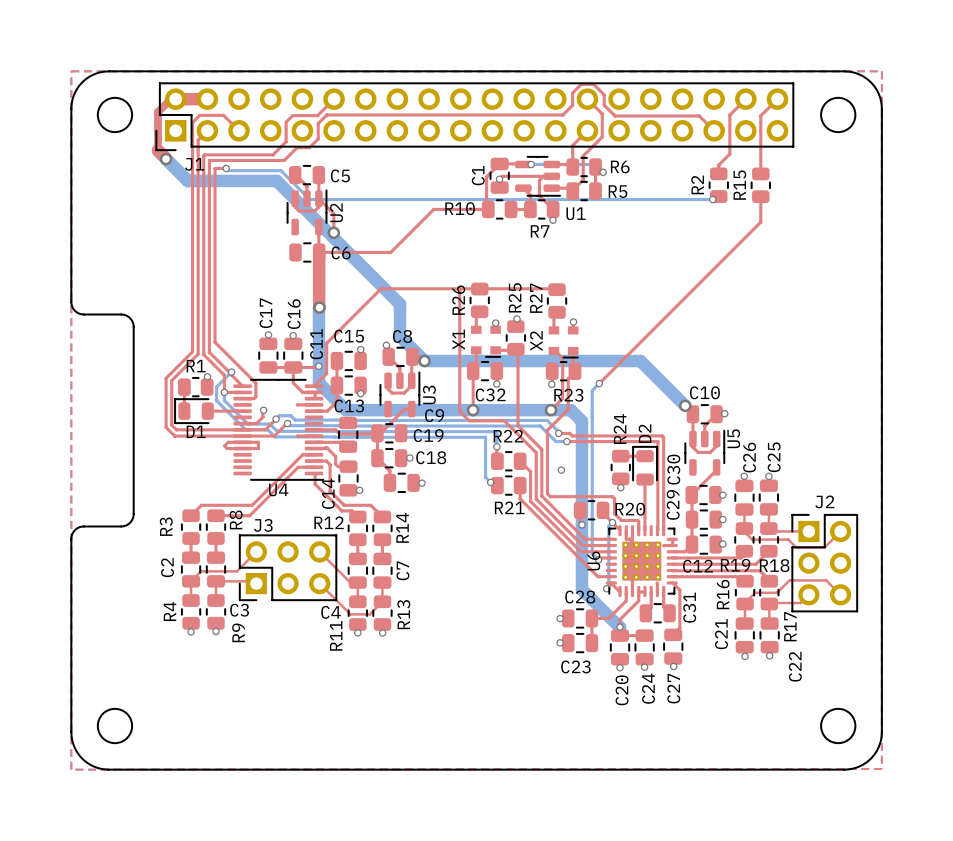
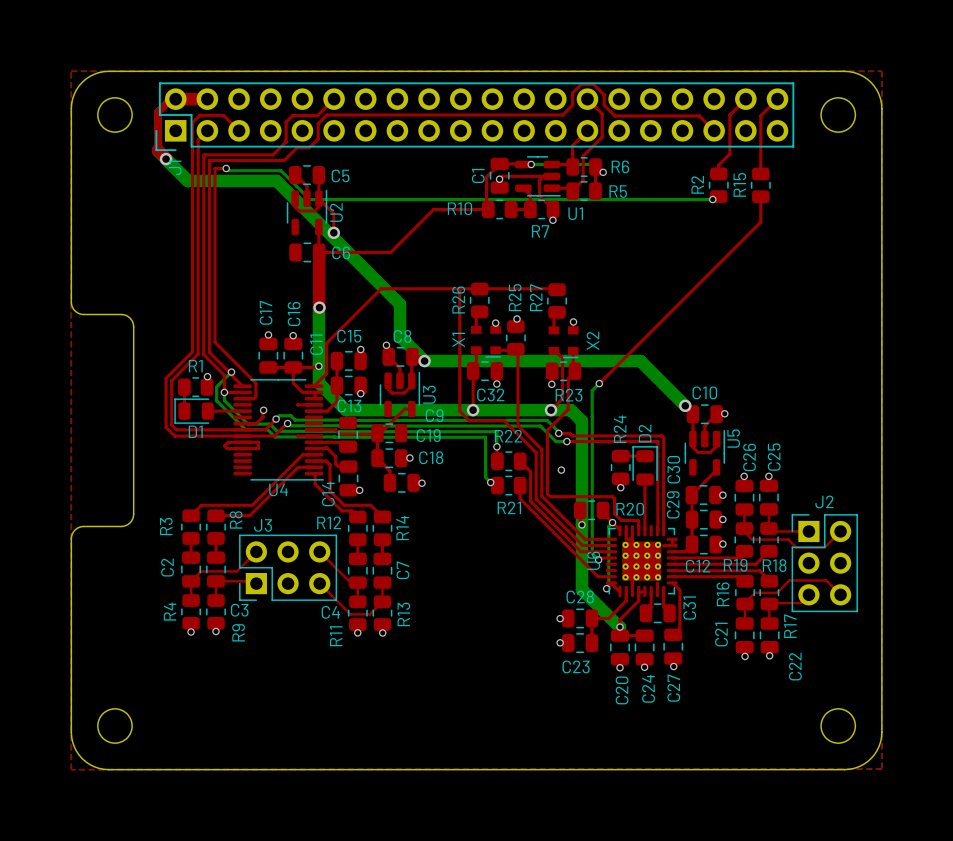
J1 name rotation: 0° (194, 164) -> 90° counterclockwise (175, 167)
X2 name position: X2 (536, 341) -> X2 (592, 340)

